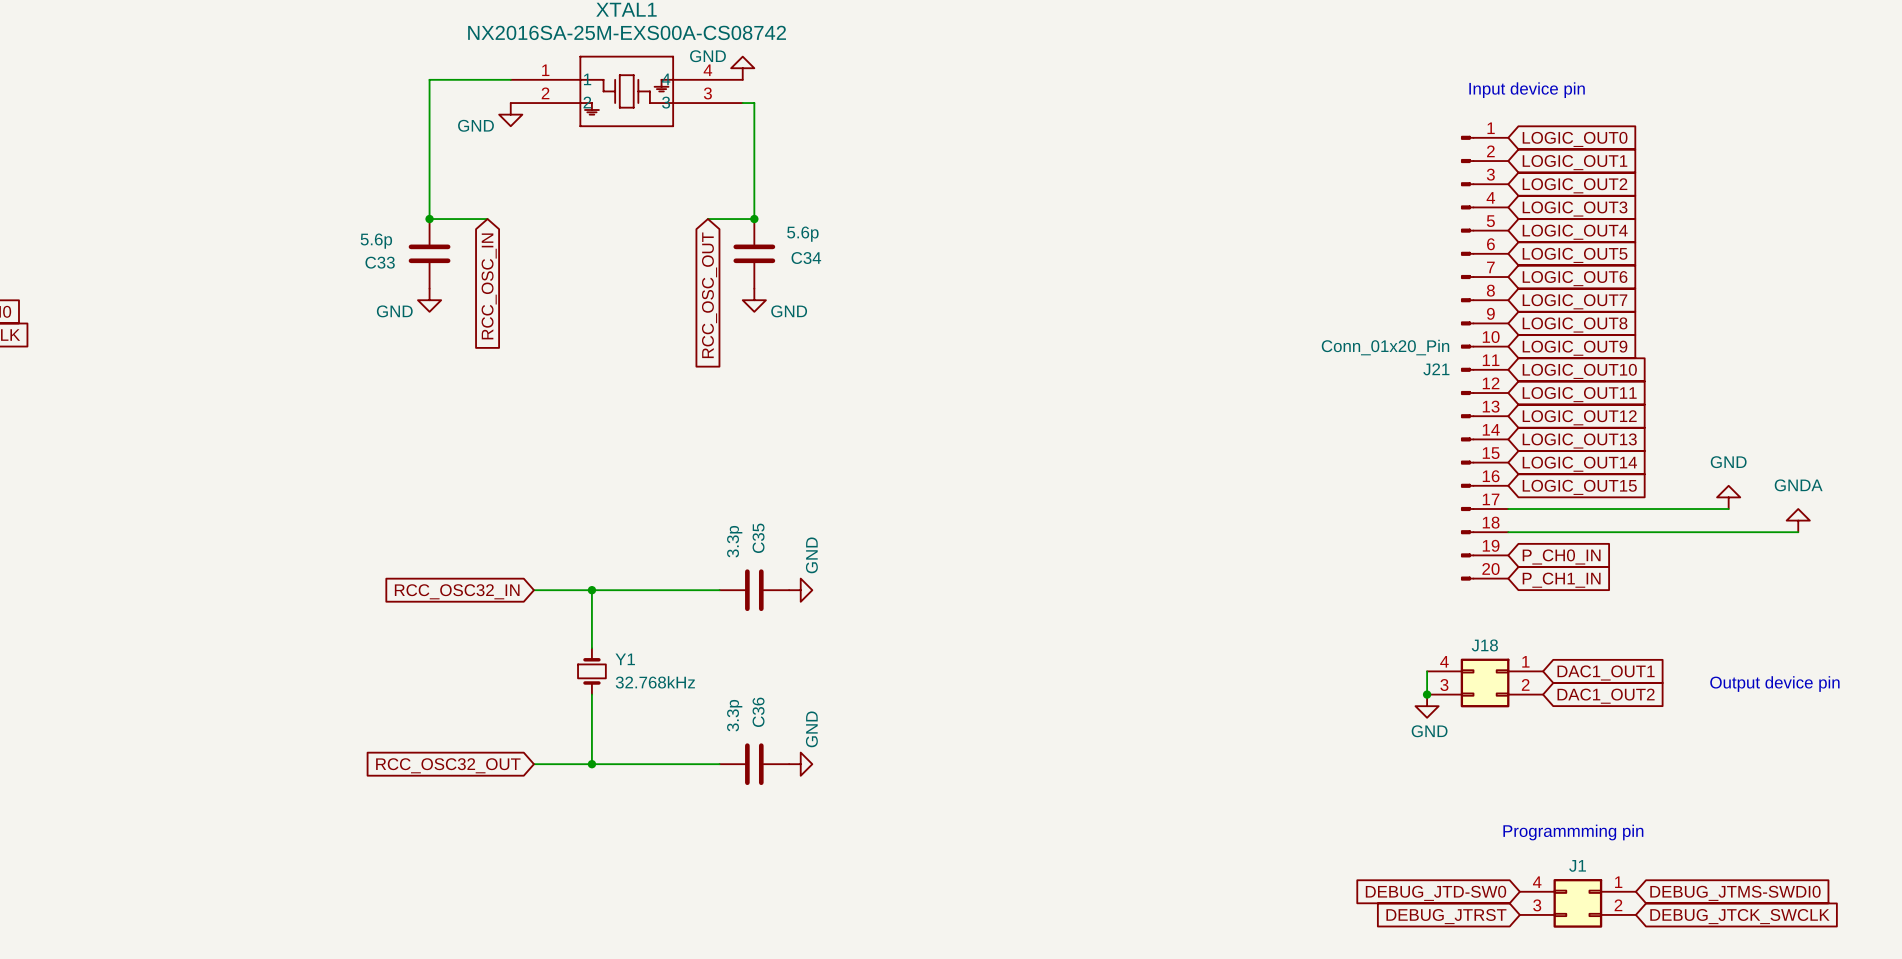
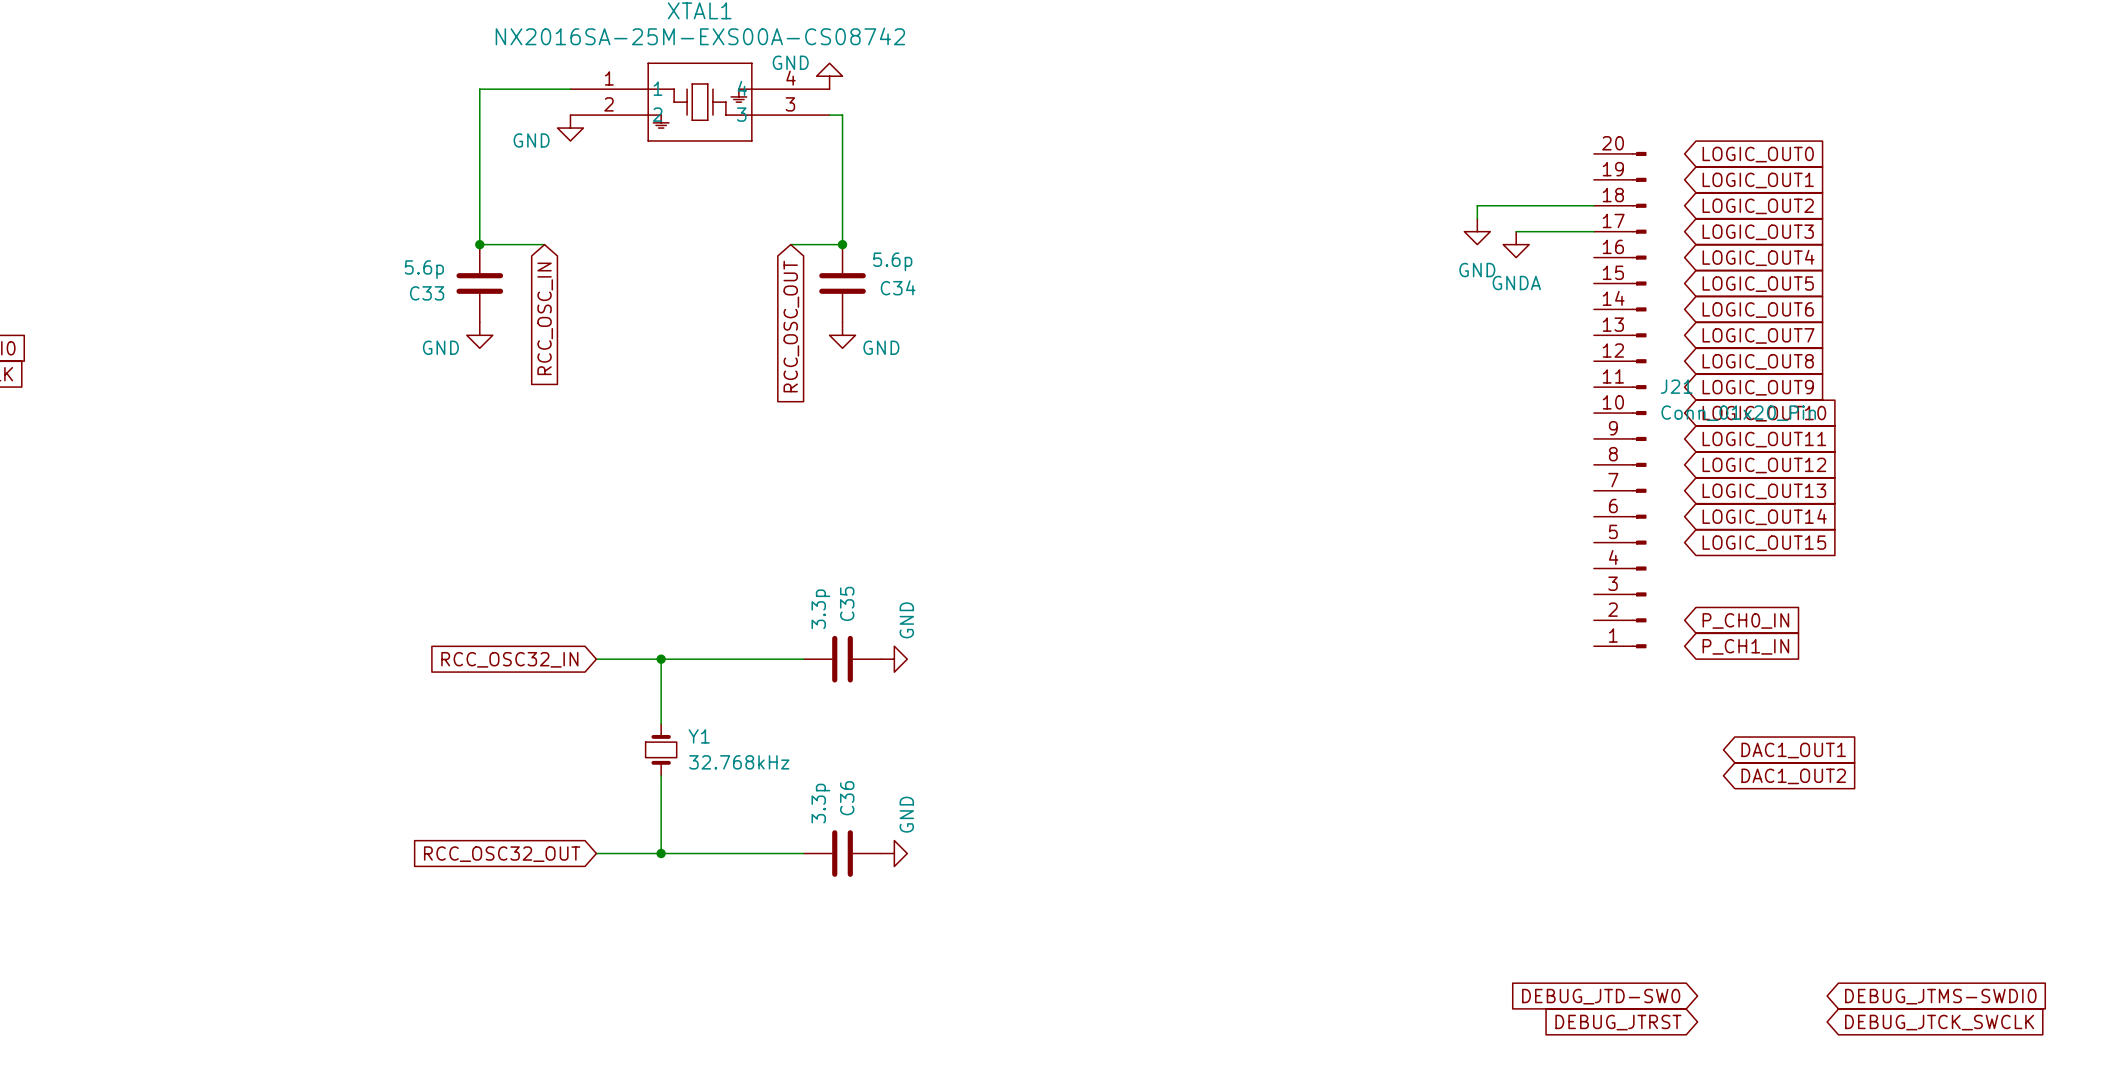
text: Input device pin (1527, 90) -> none
wire: none -> (1593, 205) (1477, 205) (1477, 218)
power symbol: none -> GND (1477, 231)
wire: none -> (1516, 231) (1593, 231)
power symbol: none -> GNDA (1516, 244)
J21 rotation: 0° (1467, 358) -> 180° (1639, 400)
power symbol: GND (1728, 497) -> none
wire: (1508, 509) (1728, 509) -> none
power symbol: GNDA (1798, 520) -> none
wire: (1508, 532) (1798, 532) -> none
wire: (1427, 671) (1427, 694) -> none
J18: (1485, 682) -> none
text: Output device pin (1774, 684) -> none
junction: (1427, 694) -> none
power symbol: GND (1427, 706) -> none
text: Programmming pin (1573, 832) -> none
J1: (1577, 903) -> none

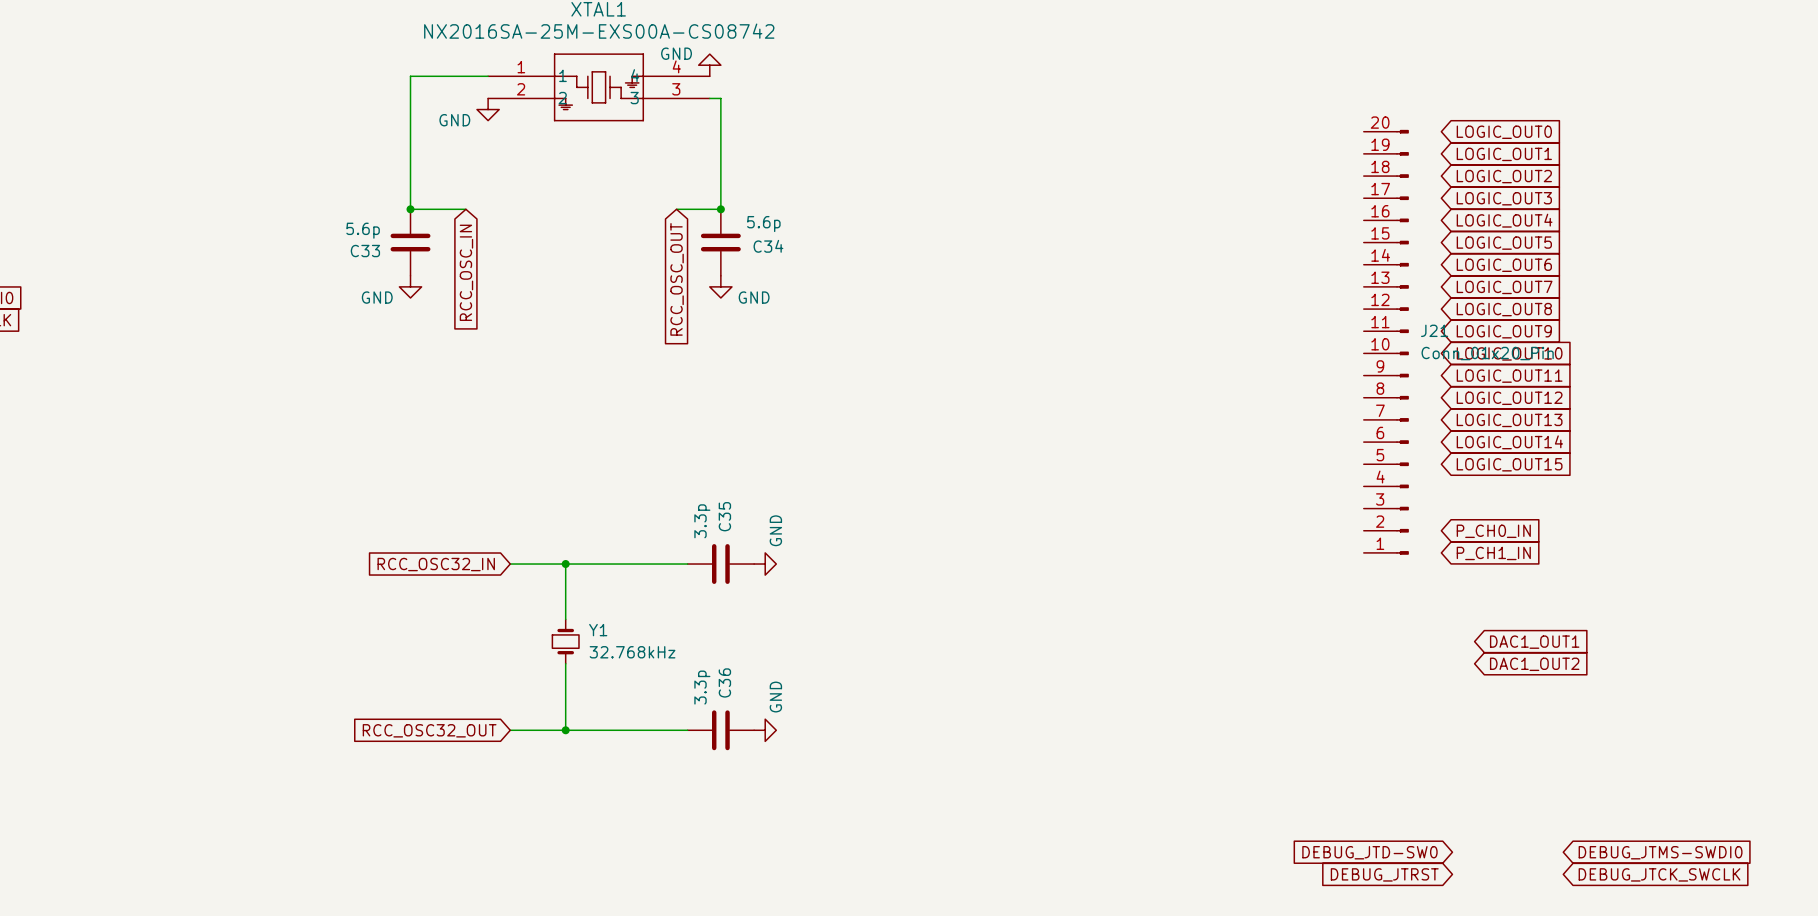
wire: (1593, 205) (1477, 205) (1477, 218) -> none
power symbol: GND (1477, 231) -> none
wire: (1516, 231) (1593, 231) -> none
power symbol: GNDA (1516, 244) -> none

